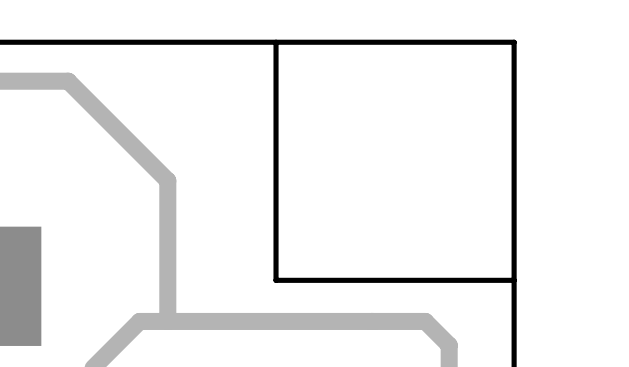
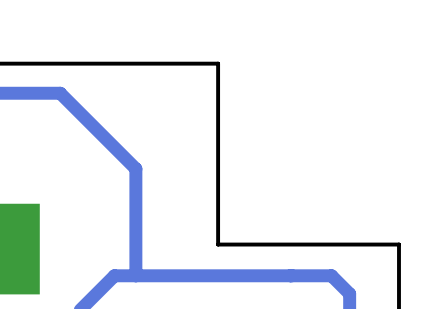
board edge: (276, 42) (514, 42) (514, 280) -> none

